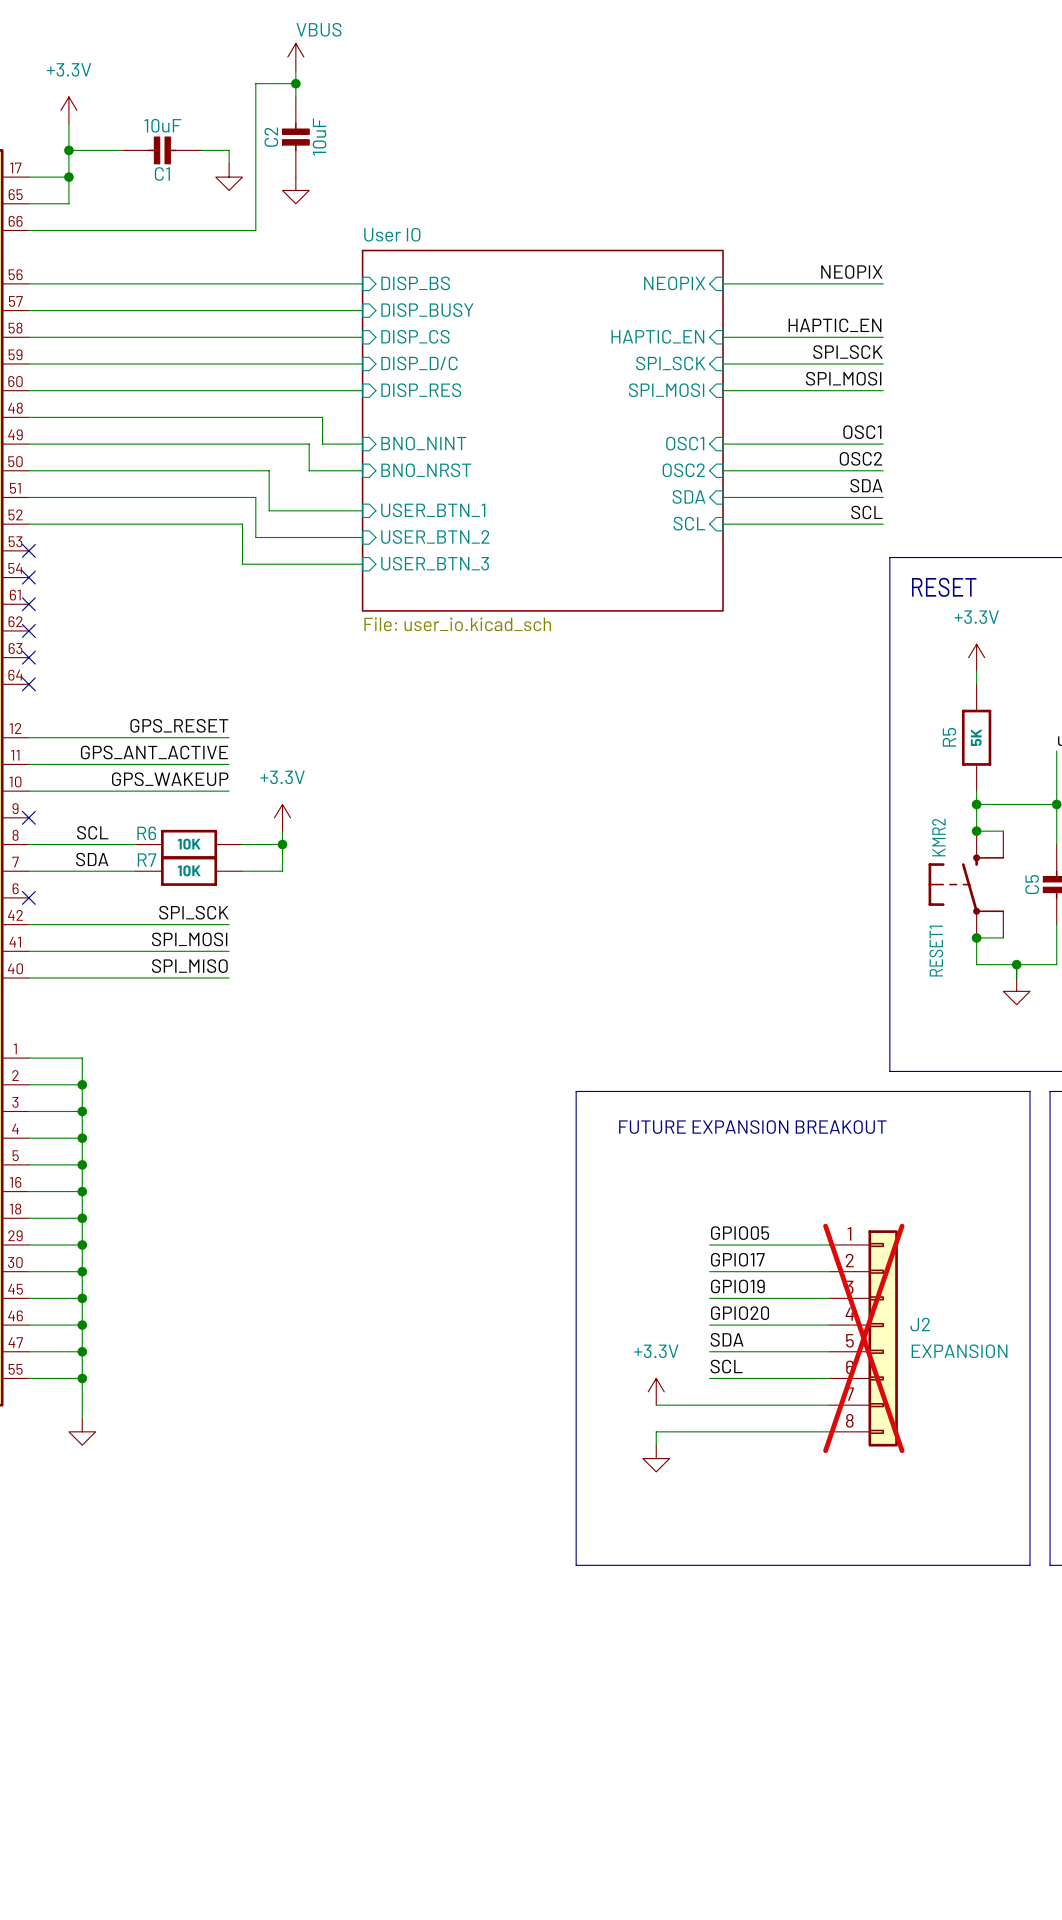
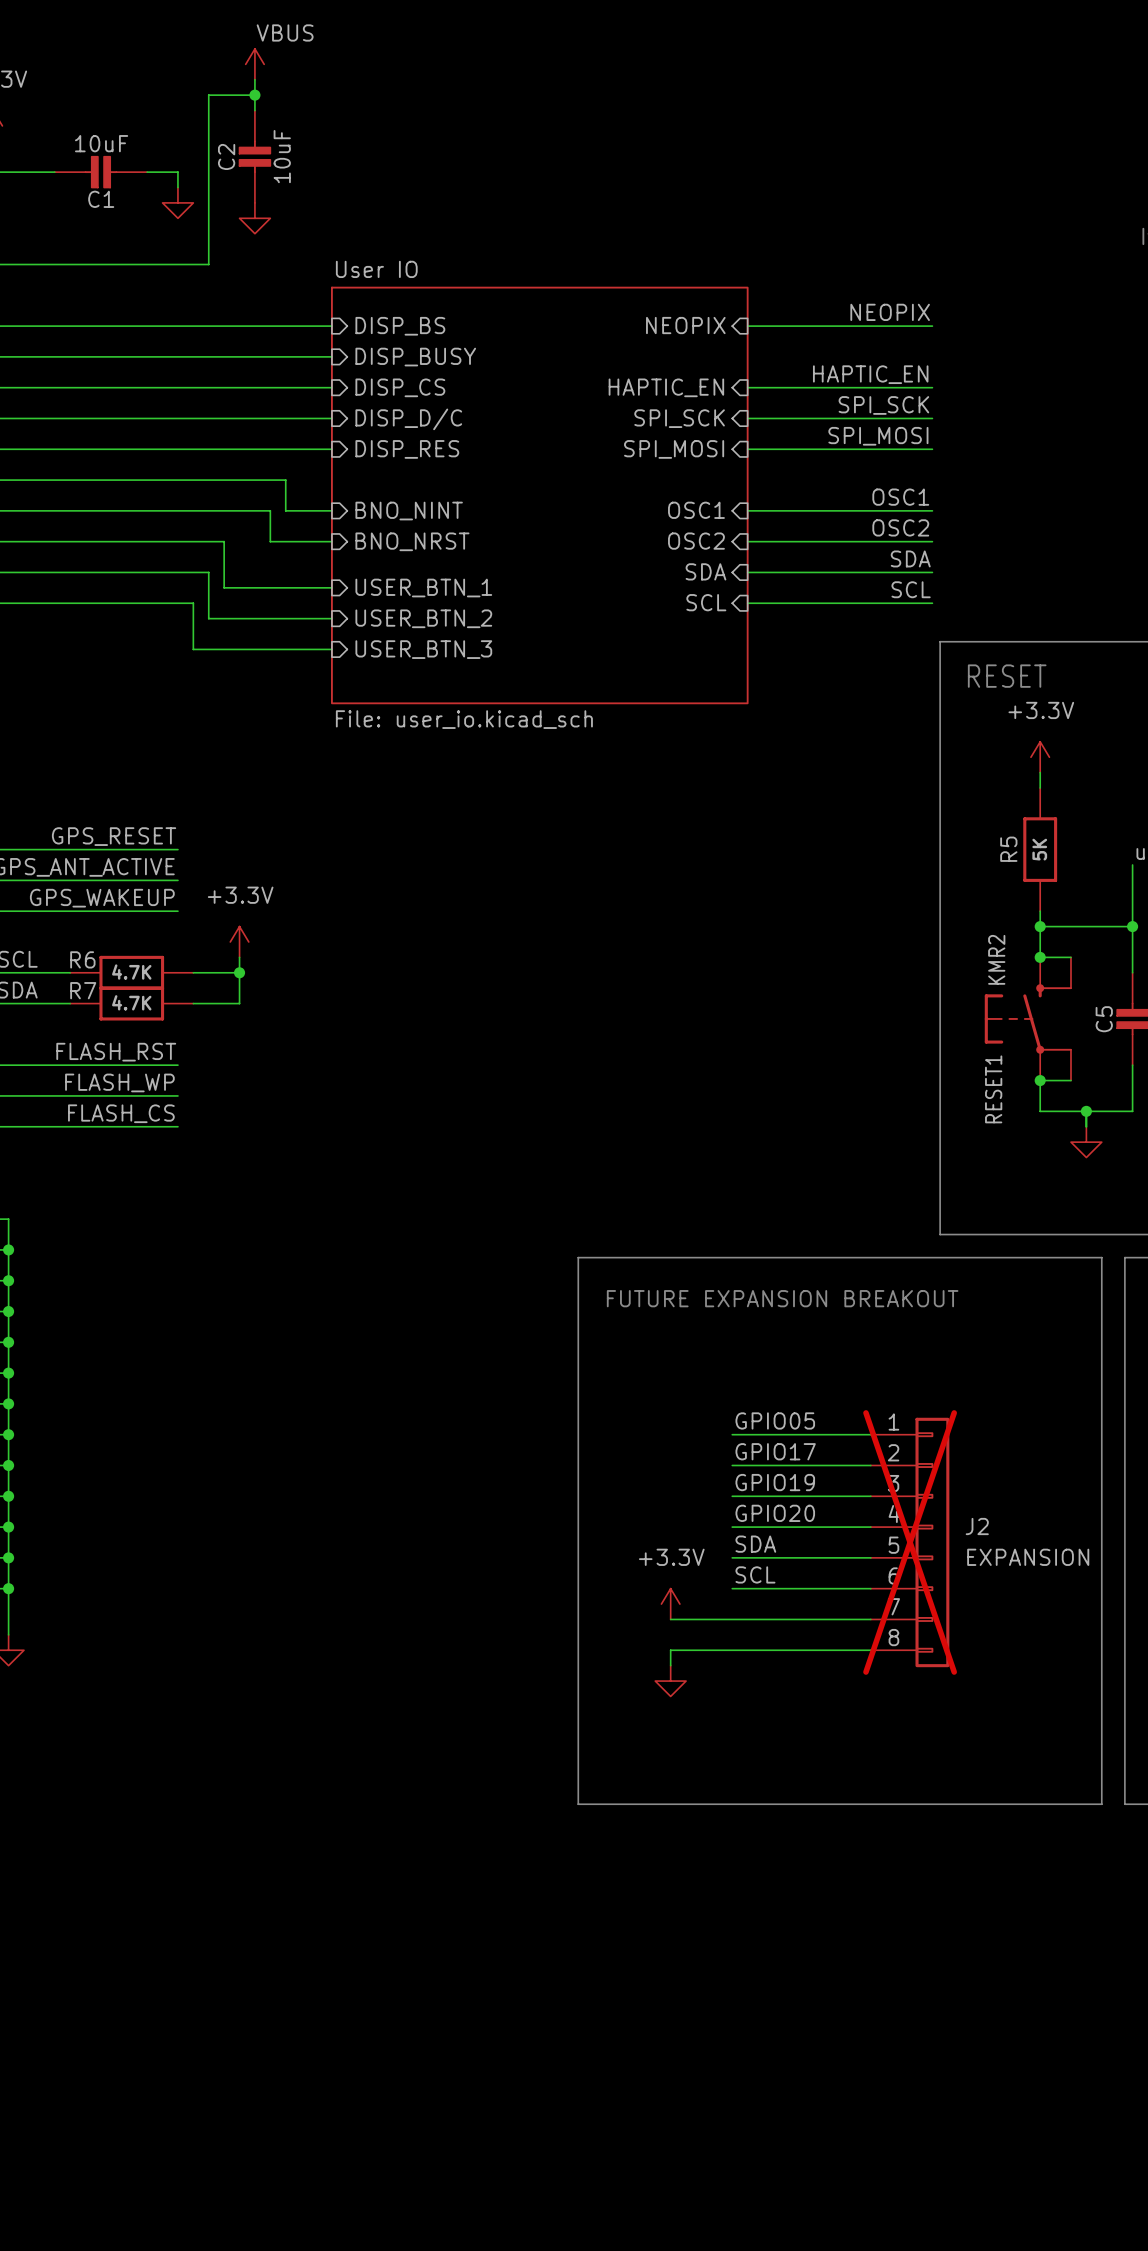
R6 value: 10K (189, 844) -> 4.7K (131, 972)
R7 value: 10K (189, 870) -> 4.7K (131, 1002)
label: SPI_SCK (193, 912) -> FLASH_RST (116, 1052)
label: SPI_MOSI (189, 939) -> FLASH_WP (119, 1082)
label: SPI_MISO (189, 966) -> FLASH_CS (121, 1113)

